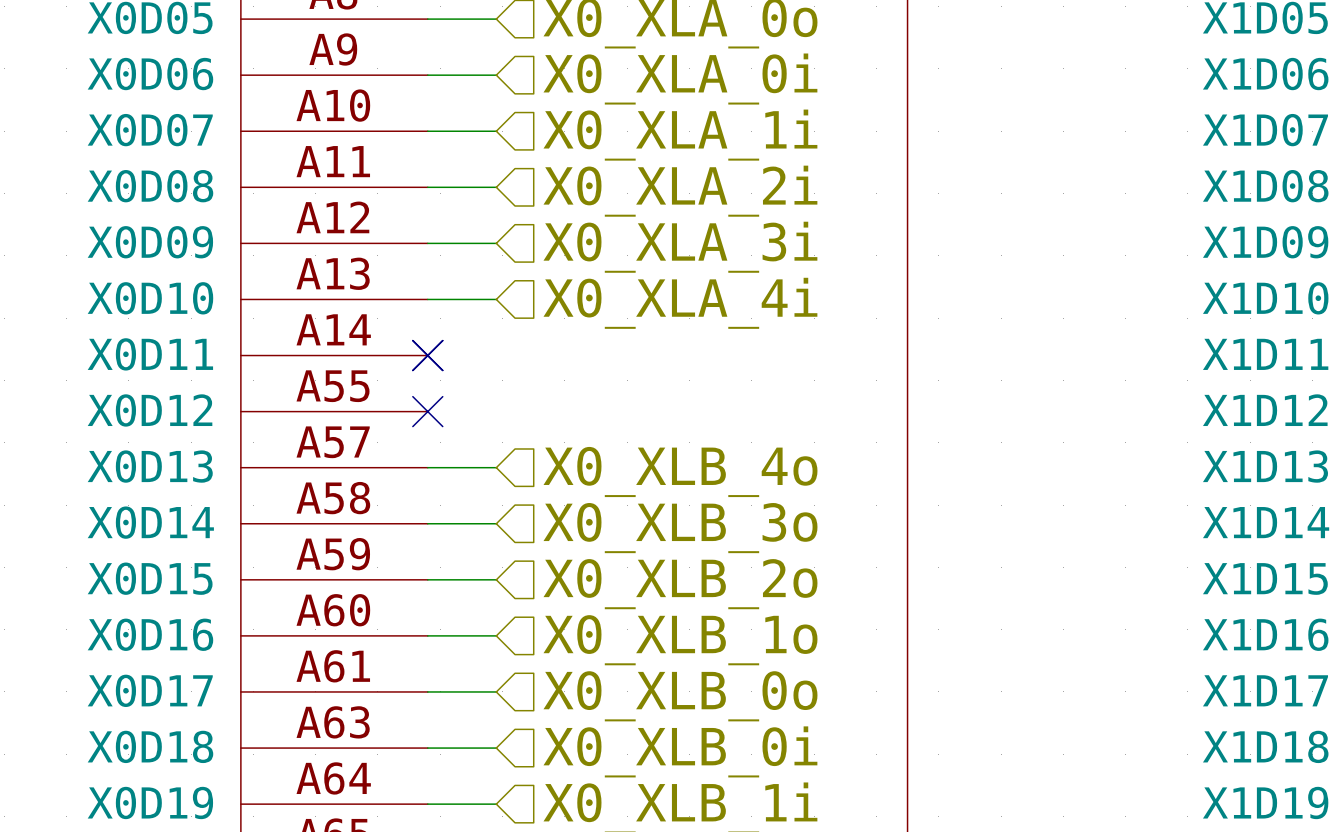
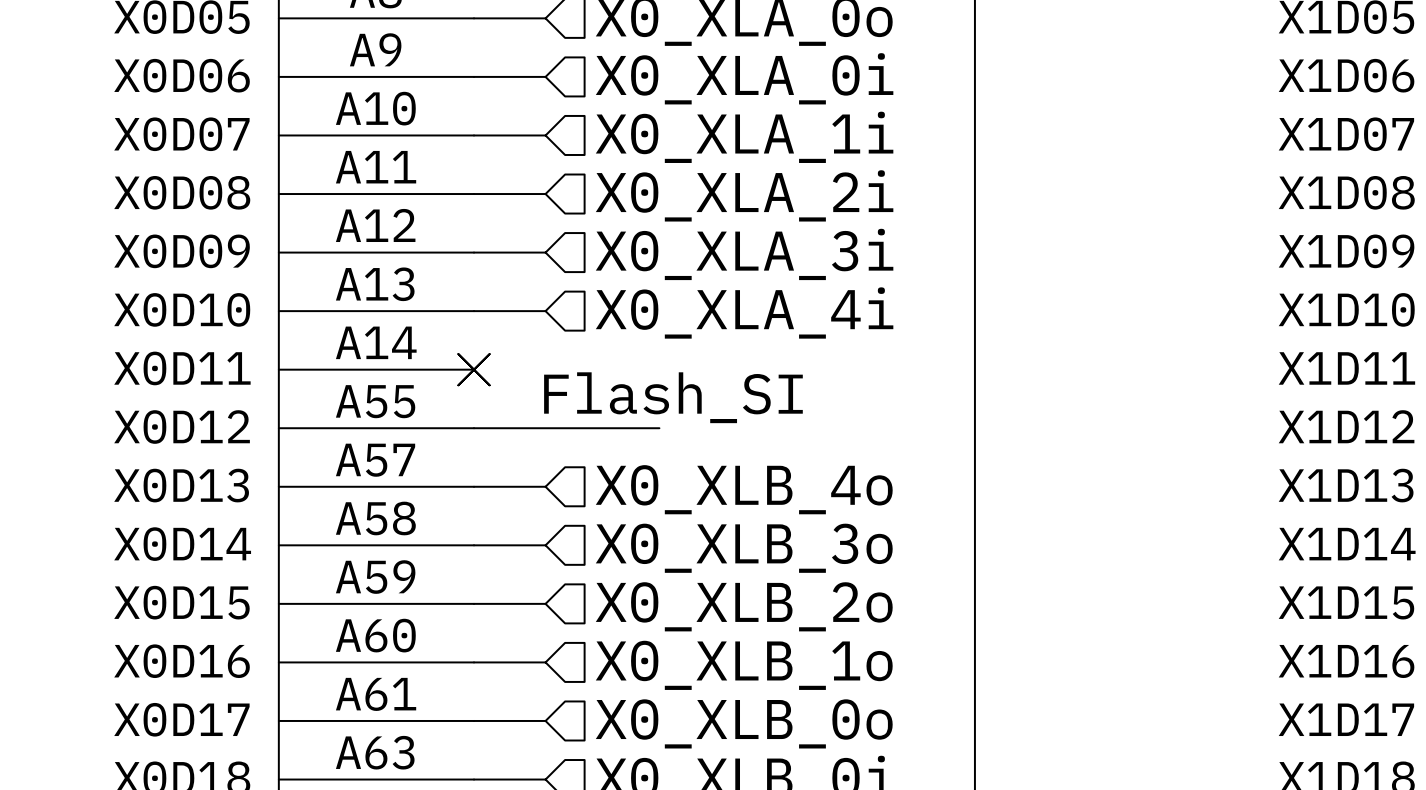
label: none -> Flash_SI (673, 397)
wire: none -> (474, 428) (659, 428)
no-connect mark: (427, 411) -> none

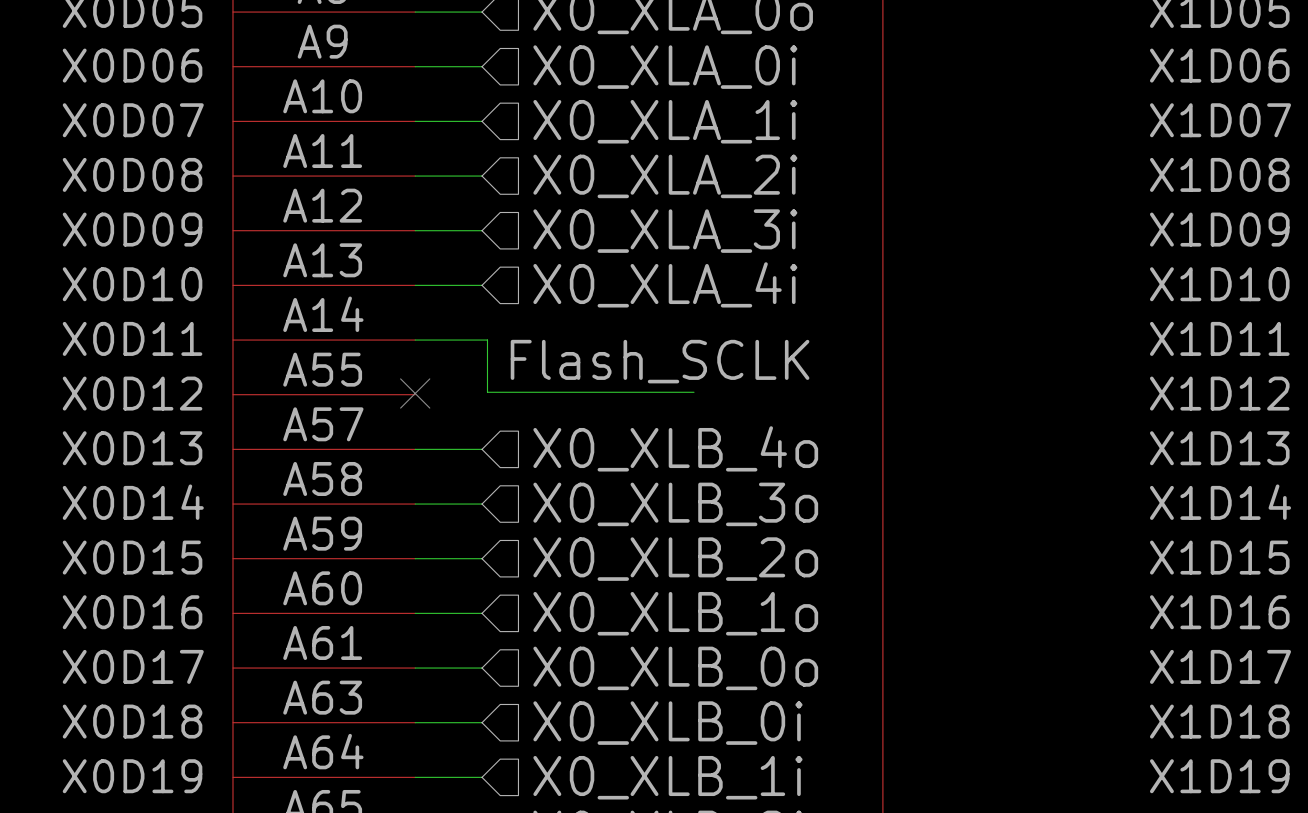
wire: none -> (415, 340) (487, 340) (487, 392) (694, 392)
no-connect mark position: (474, 369) -> (415, 393)
label: Flash_SI (673, 397) -> Flash_SCLK (660, 361)
wire: (474, 428) (659, 428) -> none

